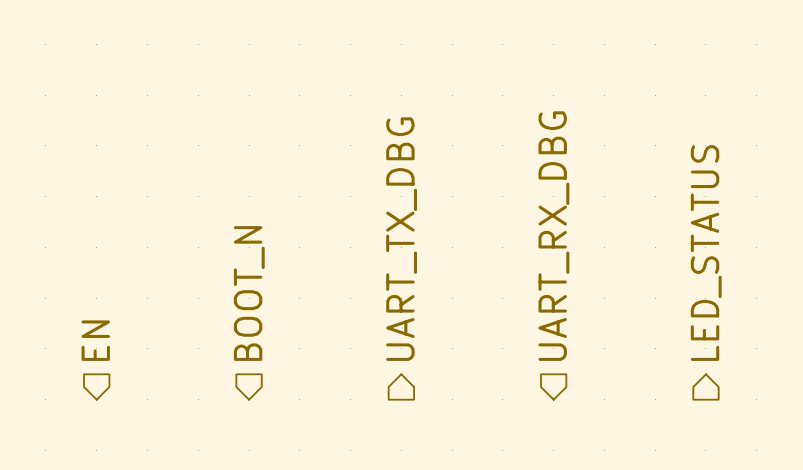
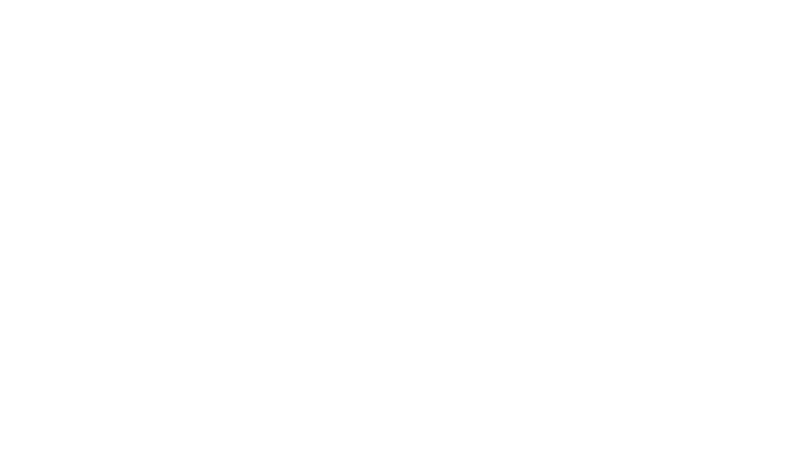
hierarchical label: UART_RX_DBG (553, 236) -> none
hierarchical label: UART_TX_DBG (401, 239) -> none
hierarchical label: LED_STATUS (706, 253) -> none
hierarchical label: BOOT_N (249, 293) -> none
hierarchical label: EN (95, 340) -> none

